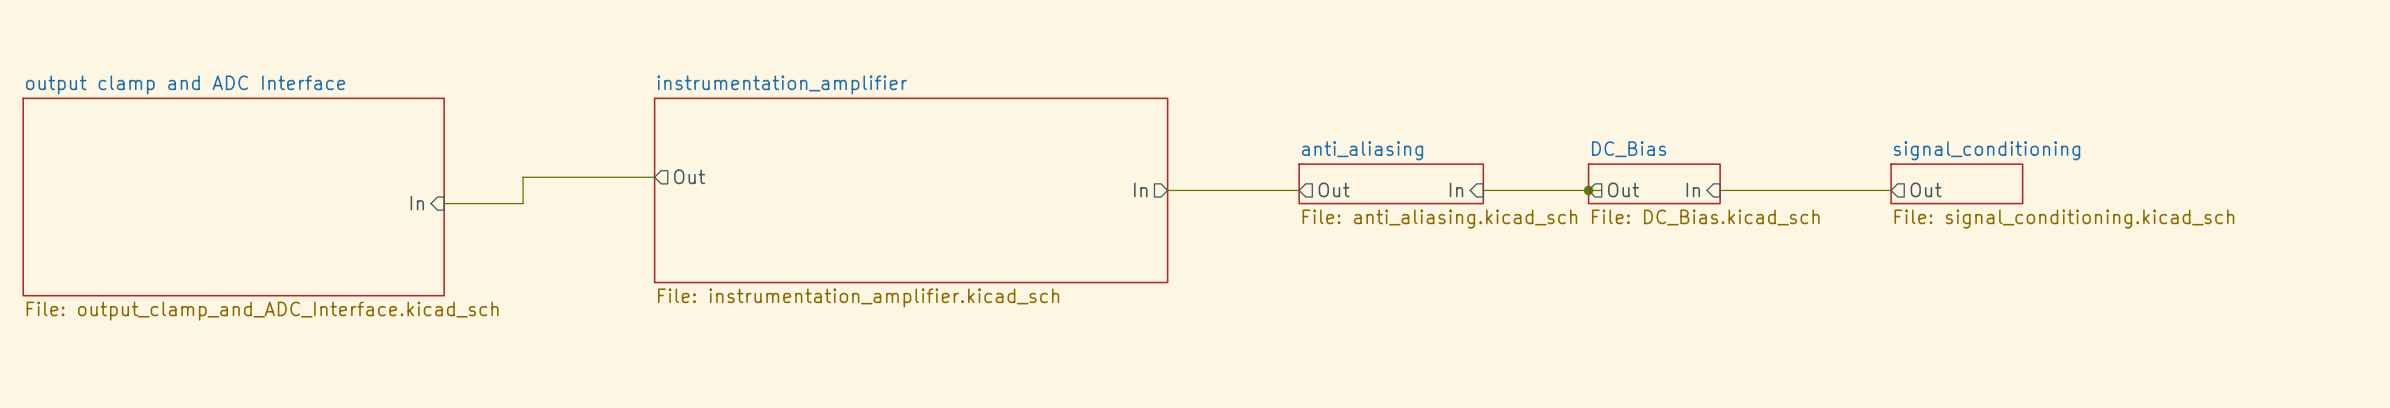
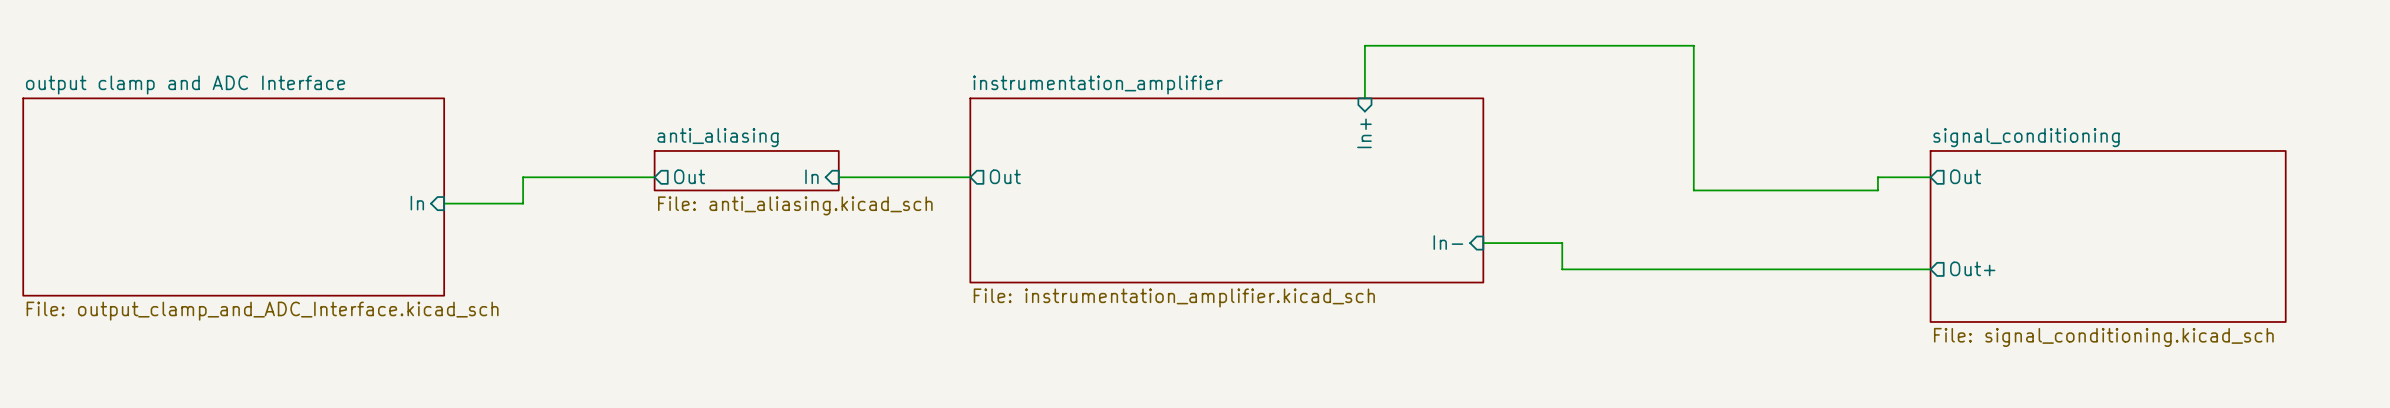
wire: none -> (1364, 98) (1364, 45) (1693, 45) (1693, 190) (1720, 190)
sheet pin: none -> In+ (1364, 133)
sheet anti_aliasing: none -> File: anti_aliasing.kicad_sch (746, 170)
sheet pin: none -> In (811, 176)
sheet pin: none -> Out (1005, 176)
wire: none -> (838, 177) (970, 177)
sheet anti_aliasing: File: anti_aliasing.kicad_sch (1391, 183) -> none
sheet DC_Bias: File: DC_Bias.kicad_sch (1654, 183) -> none
sheet signal_conditioning: File: signal_conditioning.kicad_sch (1956, 183) -> none
sheet pin: In (1140, 189) -> none
sheet pin: Out (1334, 189) -> none
sheet pin: In (1456, 189) -> none
sheet pin: Out (1623, 189) -> none
sheet pin: In (1693, 189) -> none
sheet pin position: Out (1926, 189) -> Out (1965, 176)
sheet instrumentation_amplifier: File: instrumentation_amplifier.kicad_sch (911, 190) -> none
wire: (1167, 190) (1299, 190) -> none
sheet instrumentation_amplifier: none -> File: instrumentation_amplifier.kicad_sch (1226, 190)
wire: (1483, 190) (1601, 190) -> none
junction: (1588, 190) -> none
wire: (1877, 190) (1891, 190) -> (1877, 190) (1877, 177) (1930, 177)
sheet signal_conditioning: none -> File: signal_conditioning.kicad_sch (2108, 236)
sheet pin: none -> In- (1448, 242)
wire: none -> (1483, 243) (1562, 243) (1562, 269) (1930, 269)
sheet pin: none -> Out+ (1972, 268)

